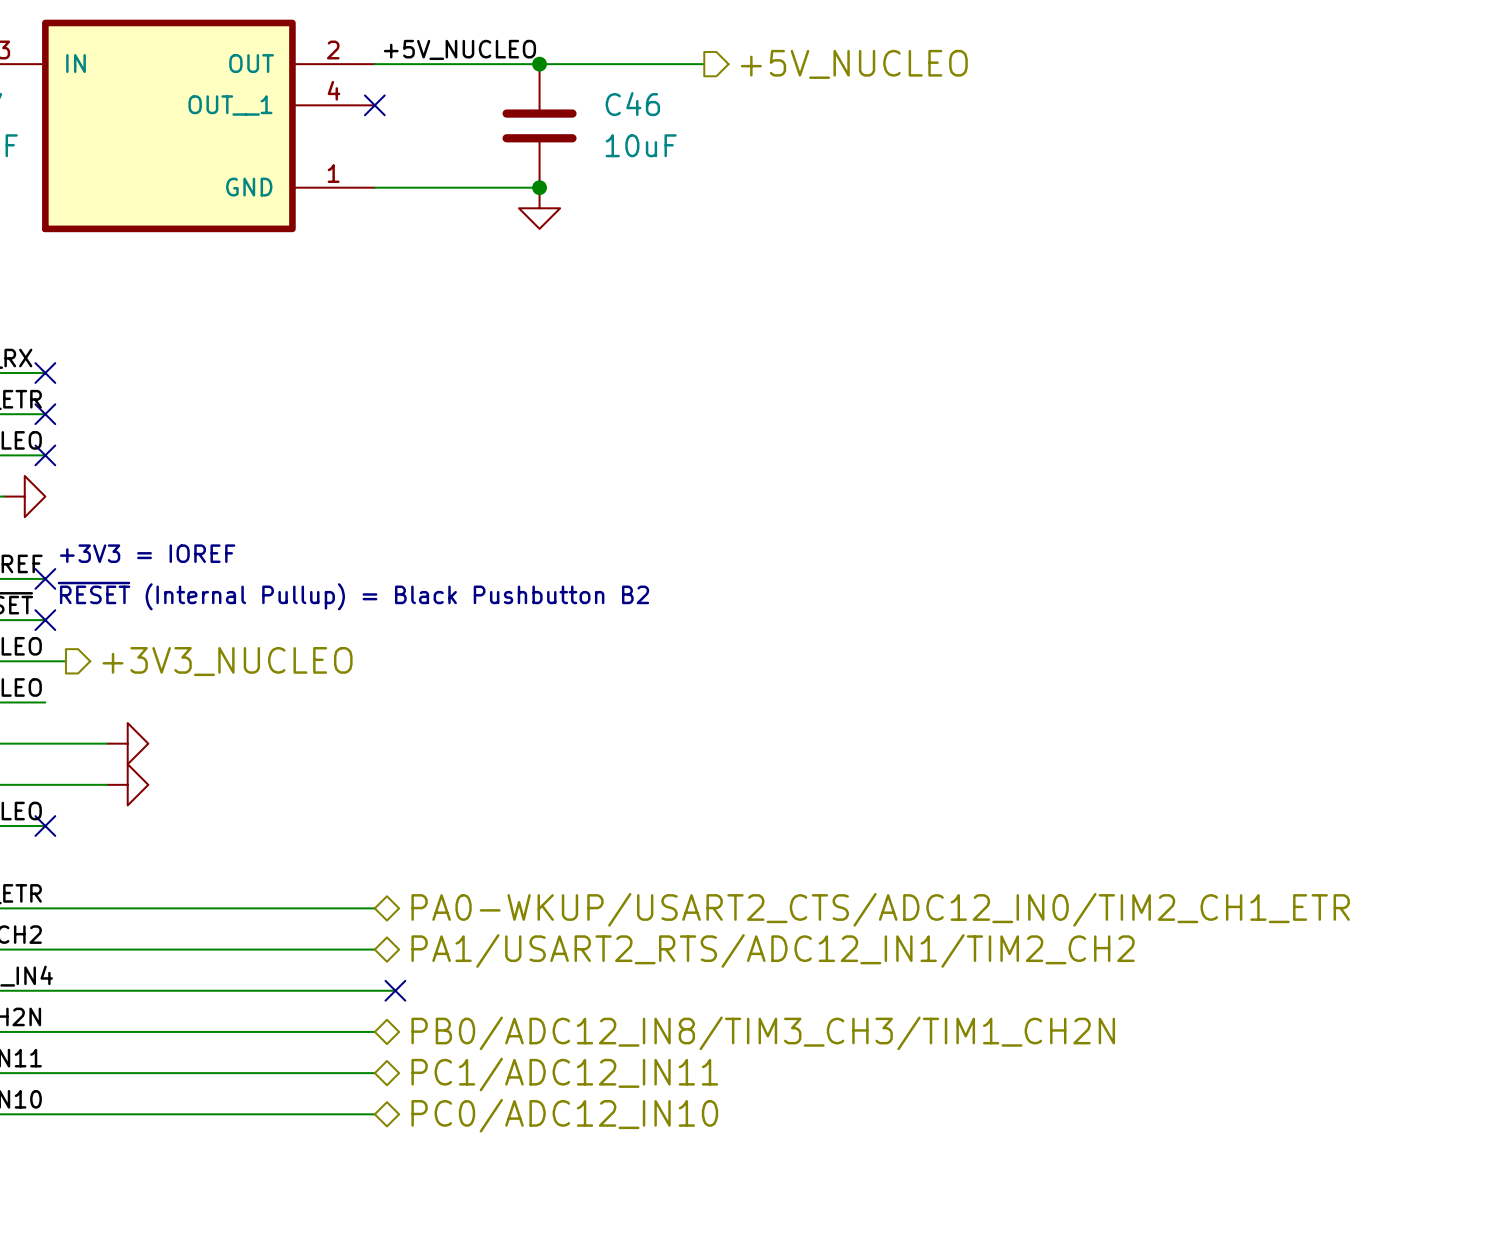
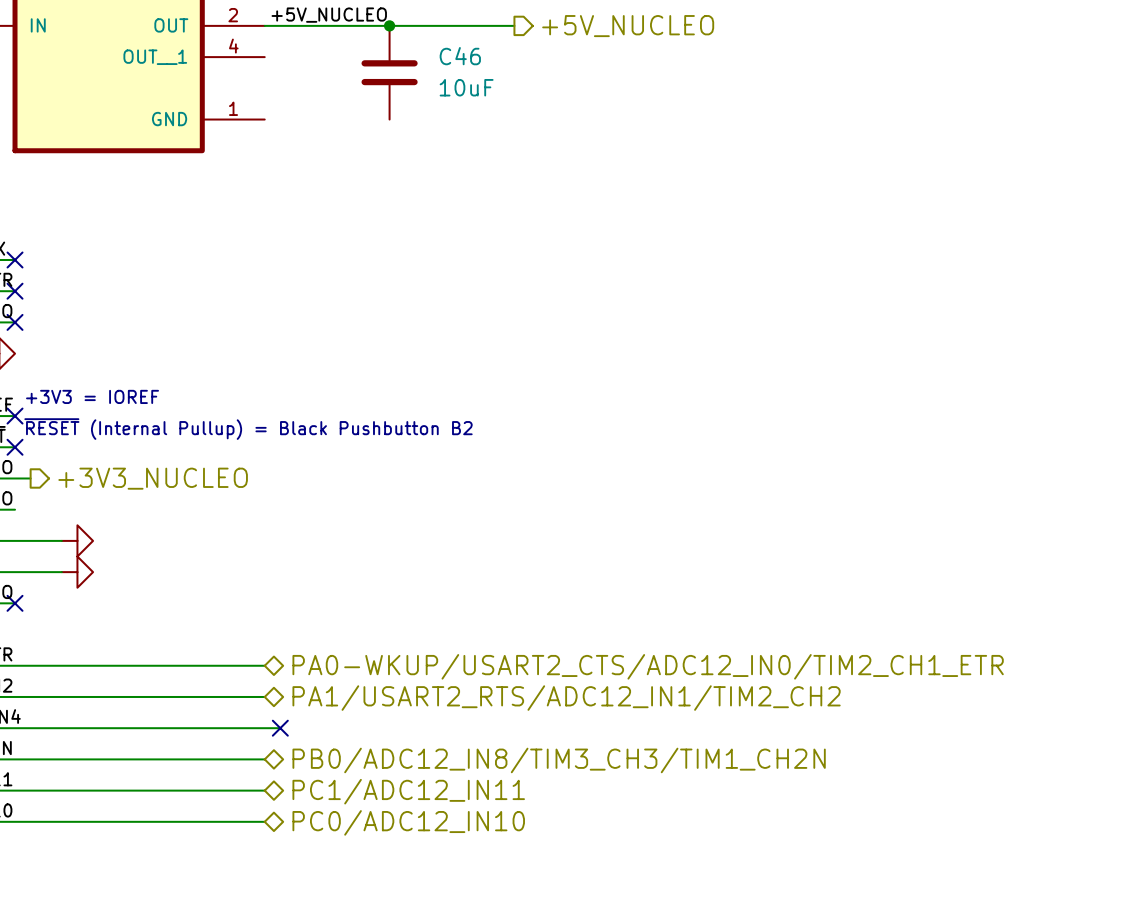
no-connect mark: (374, 105) -> none
wire: (374, 187) (539, 187) -> none
junction: (539, 187) -> none
power symbol: (539, 208) -> none

